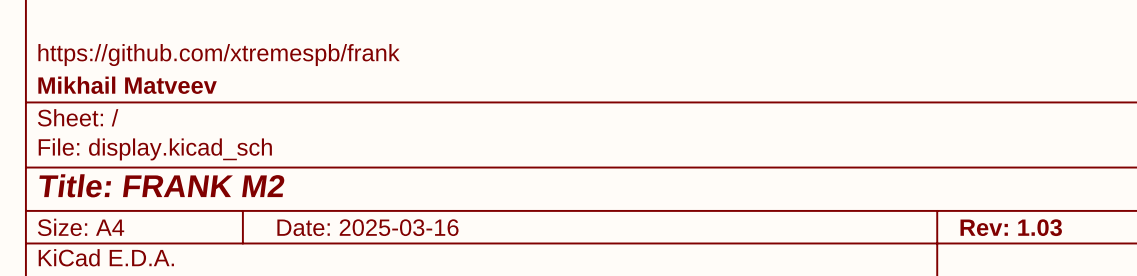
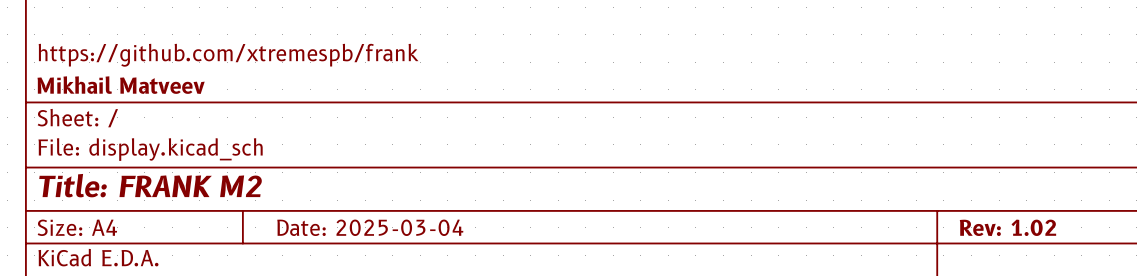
title block: Date: 2025-03-16 (367, 227) -> Date: 2025-03-04 (370, 227)
title block: Rev: 1.03 (1011, 227) -> Rev: 1.02 (1007, 227)

